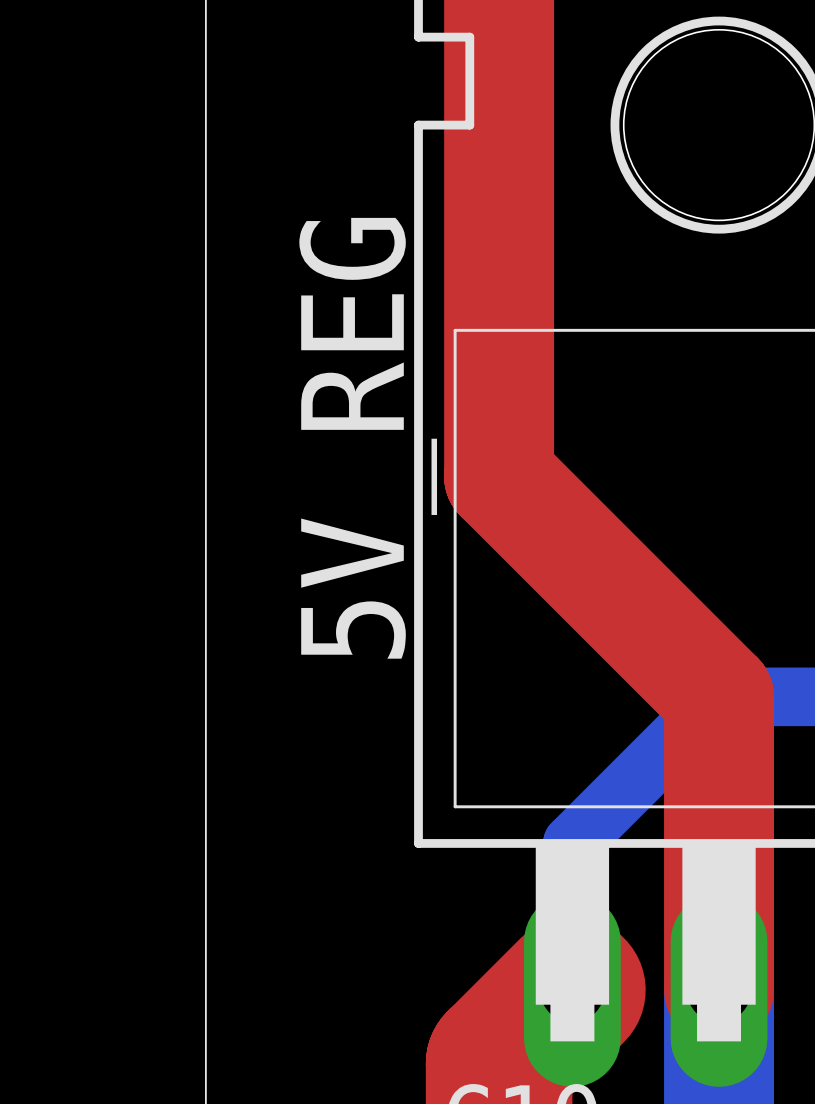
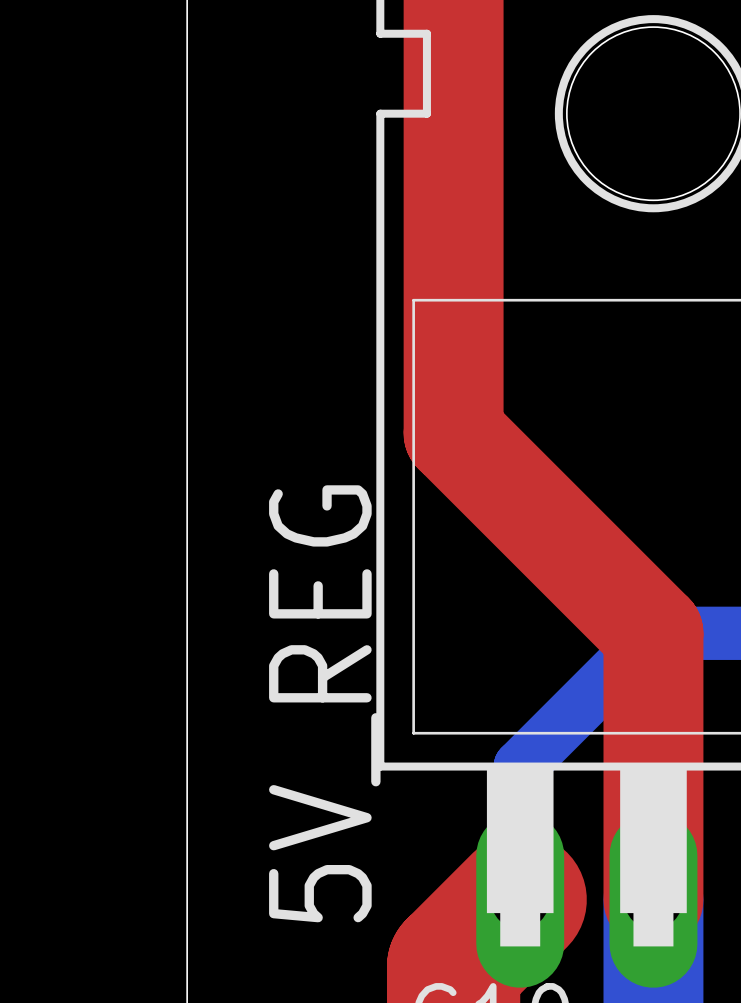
5V_REG name position: 5V_REG (368, 438) -> 5V_REG (324, 703)

